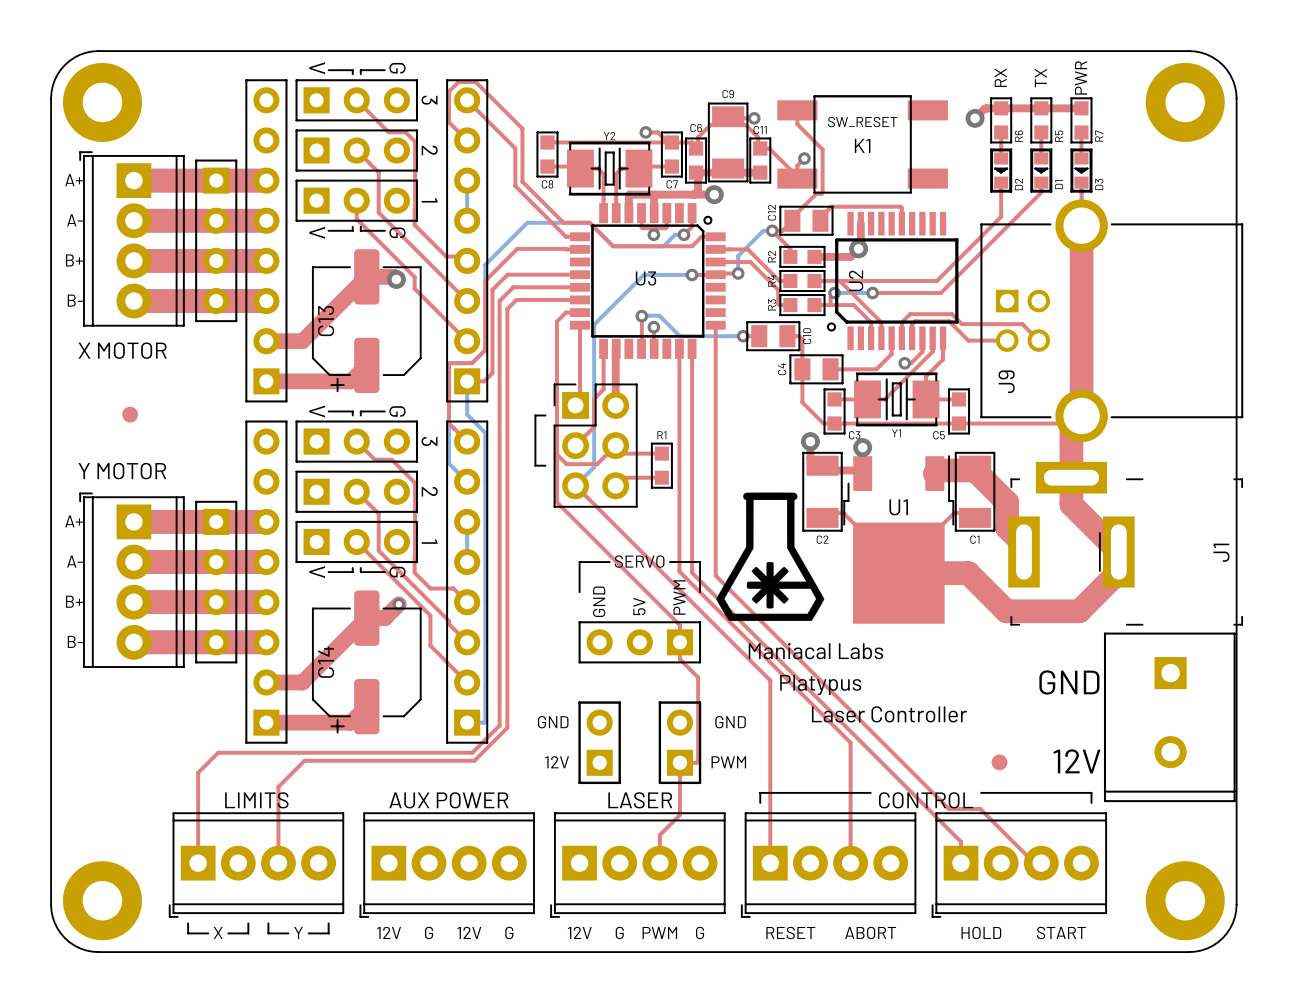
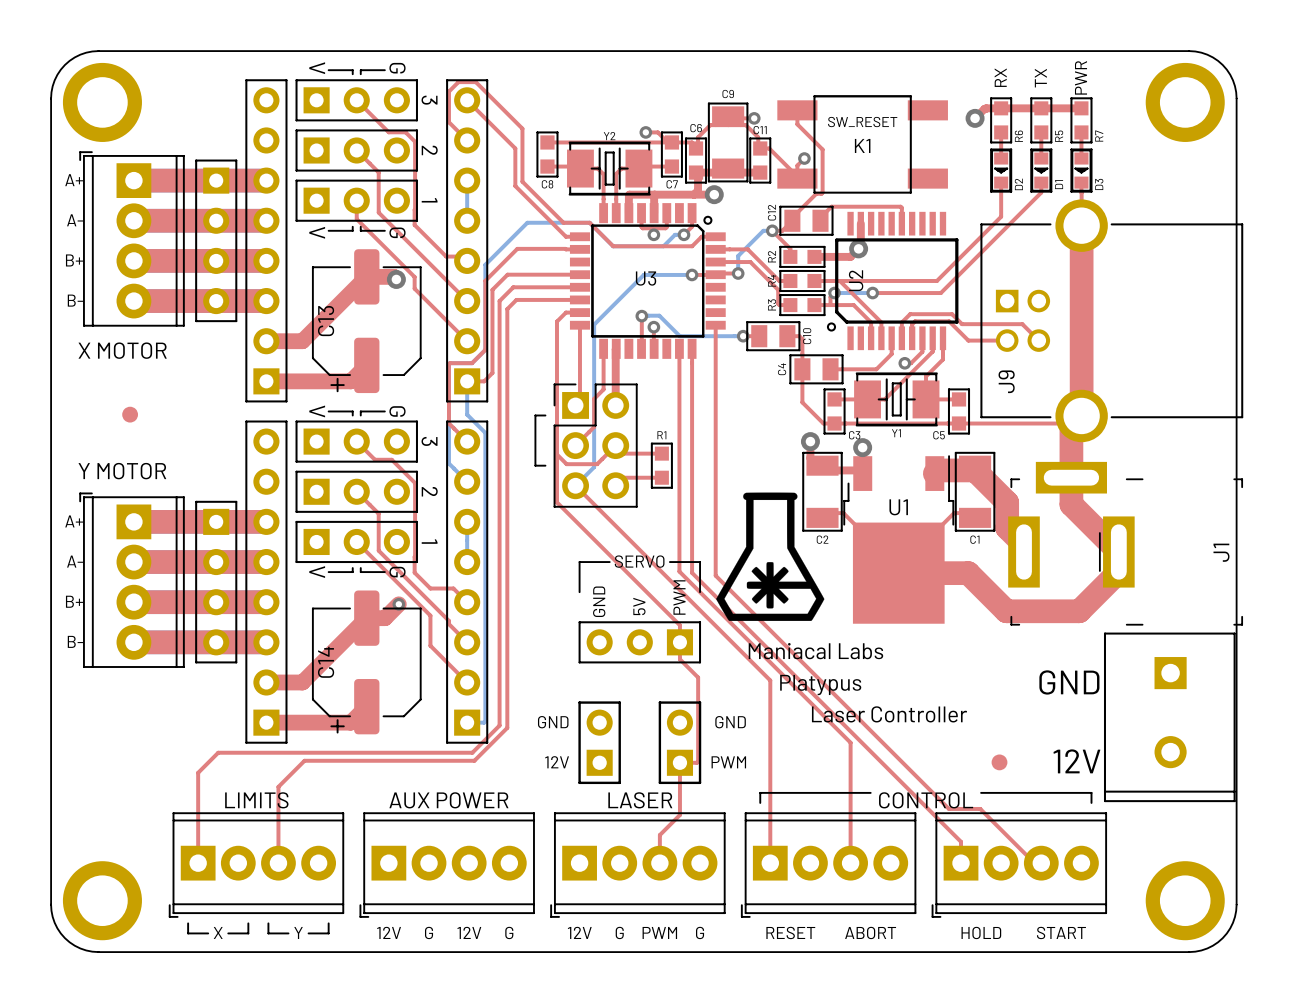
part footprint: [62, 62, 142, 142] -> [62, 62, 142, 142]
part footprint: [1145, 62, 1225, 142] -> [1145, 62, 1225, 142]
part footprint: [62, 861, 142, 941] -> [62, 861, 142, 941]
part footprint: [1145, 861, 1225, 941] -> [1145, 861, 1225, 941]

